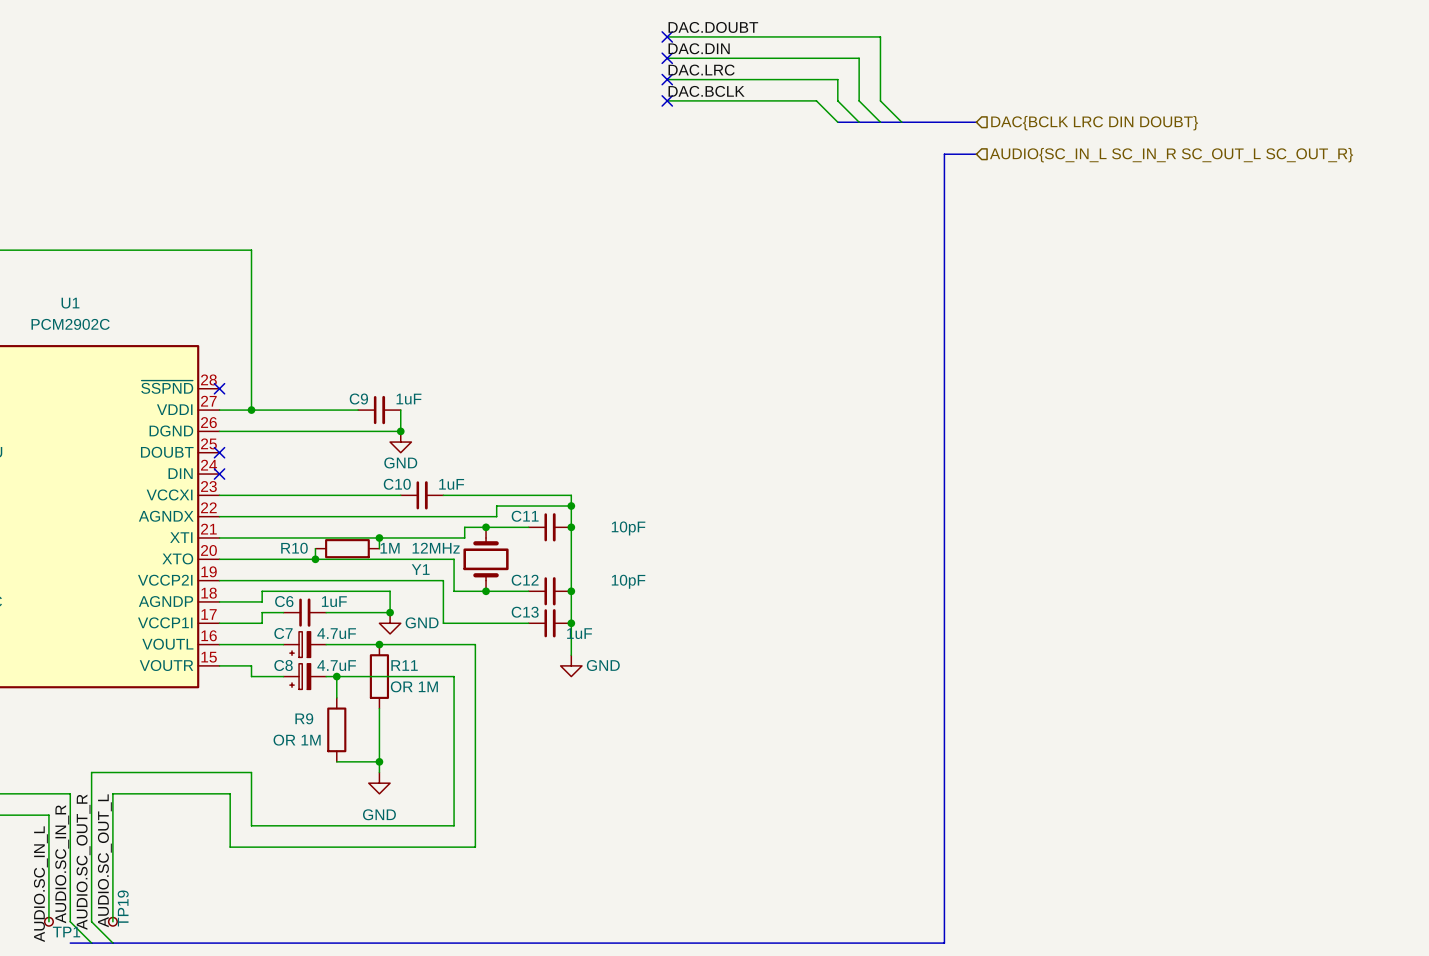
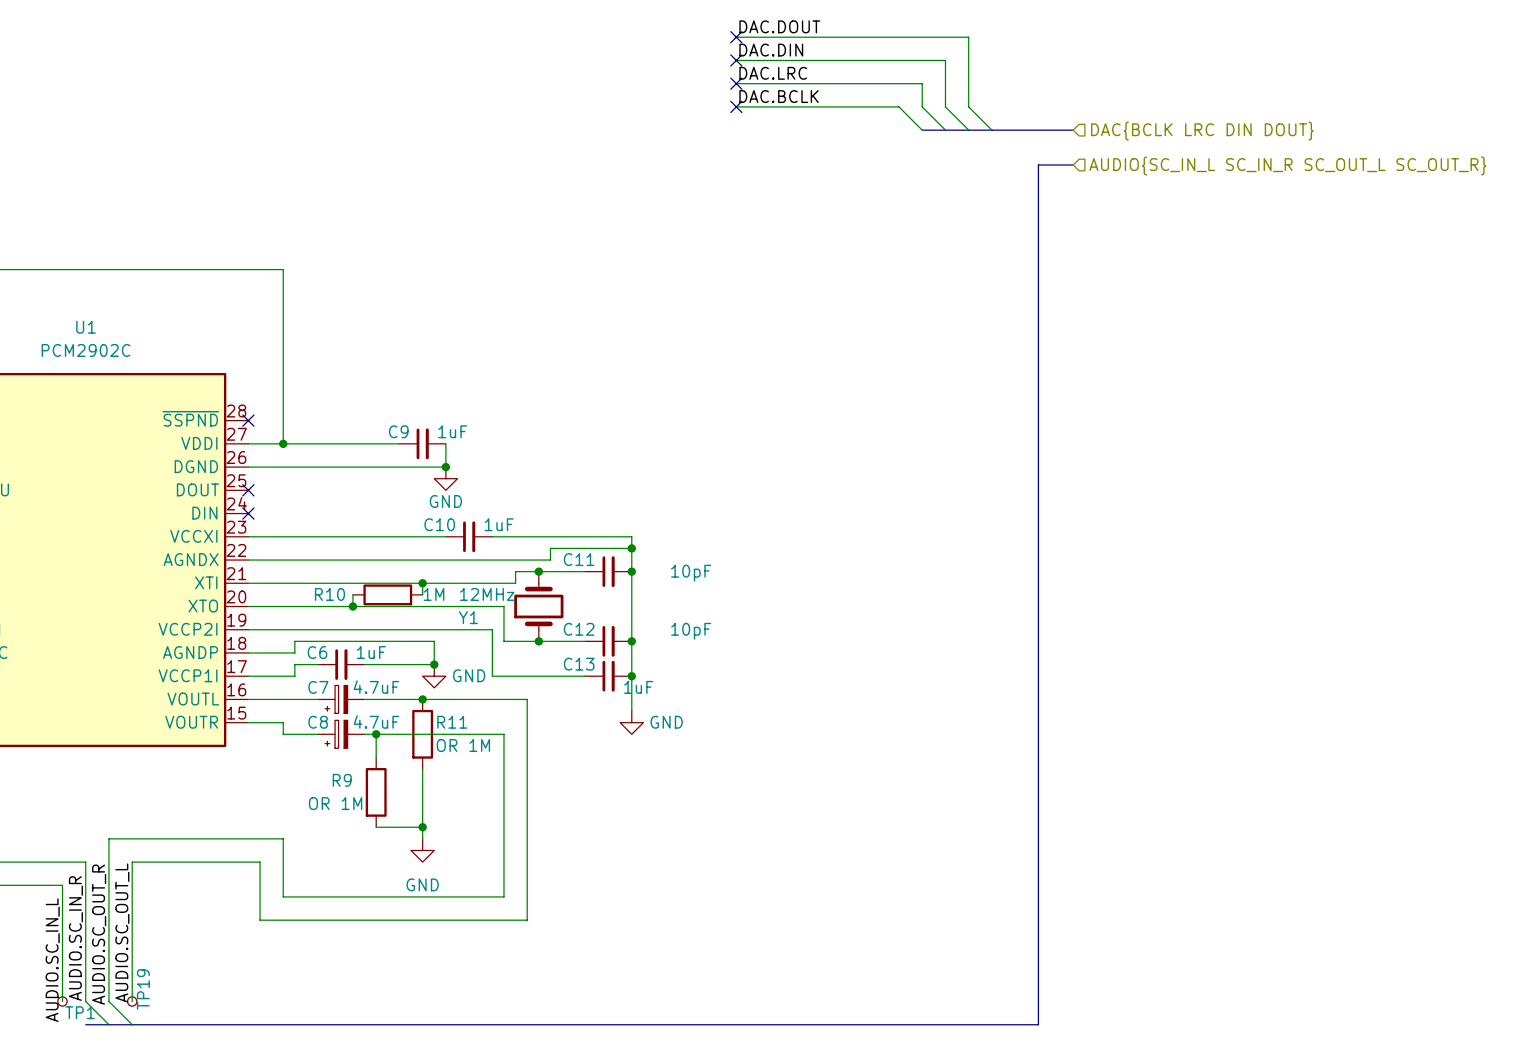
label: DAC.DOUBT (713, 27) -> DAC.DOUT (779, 26)
hierarchical label: DAC{BCLK LRC DIN DOUBT} (1094, 123) -> DAC{BCLK LRC DIN DOUT} (1202, 131)
U1 pin name: DOUBT (167, 452) -> DOUT (198, 489)

